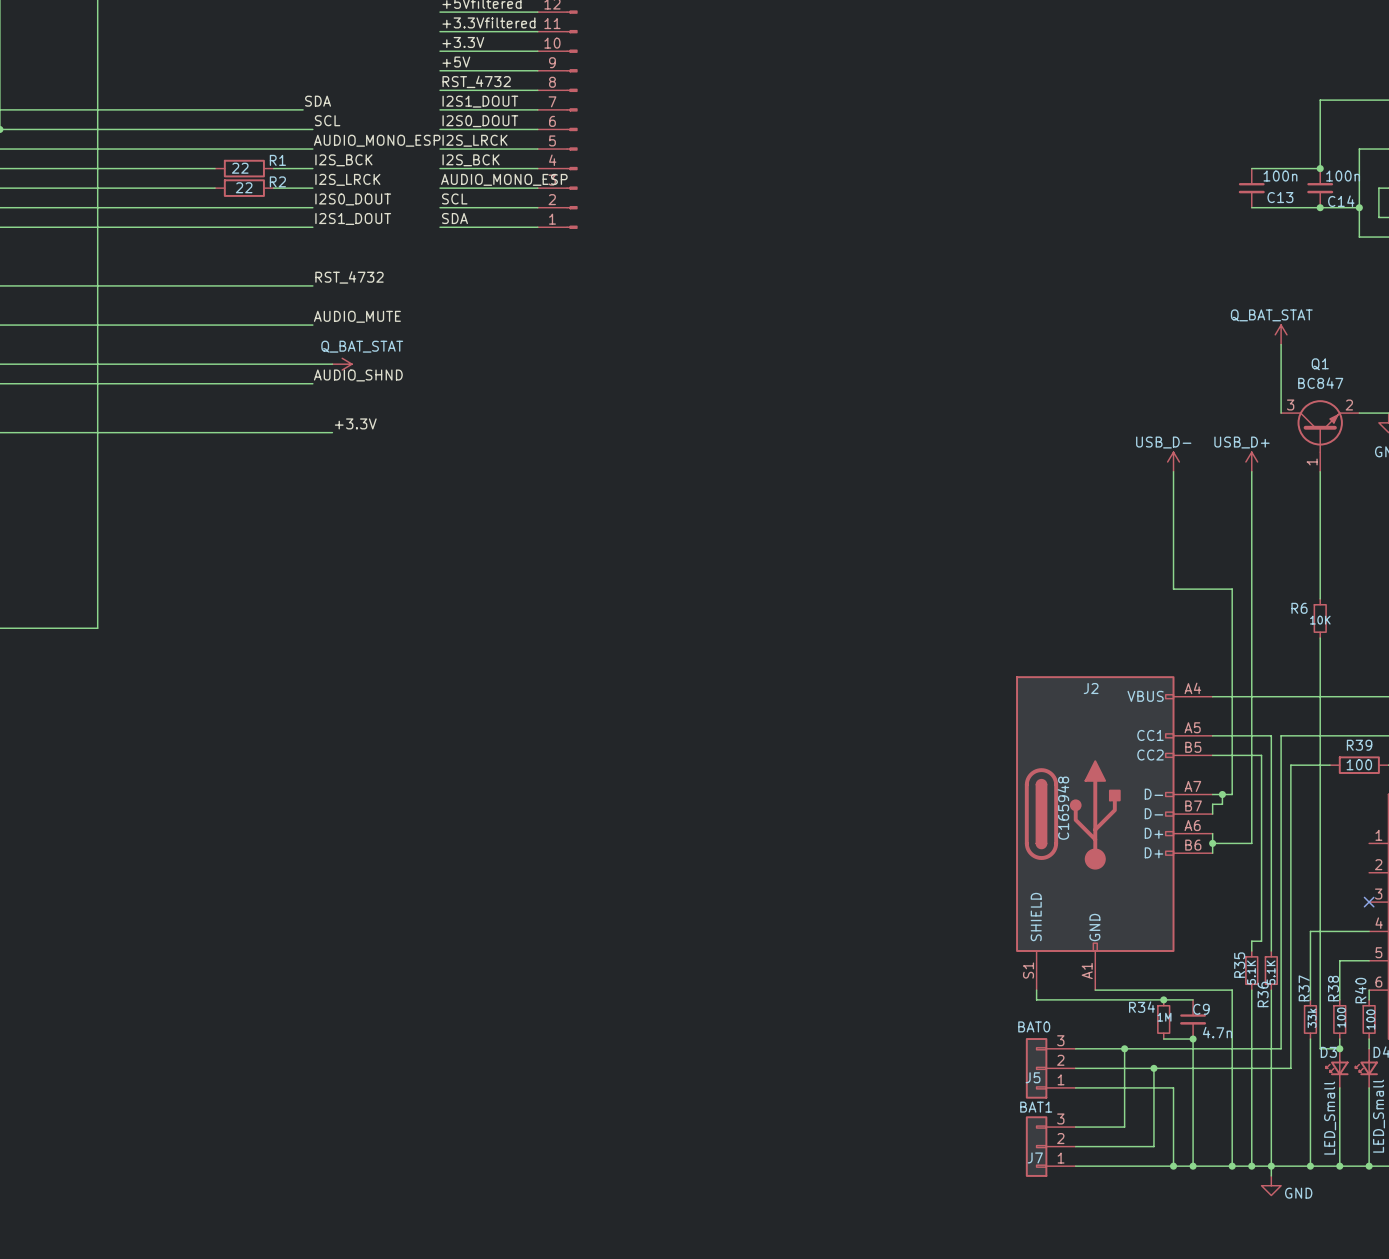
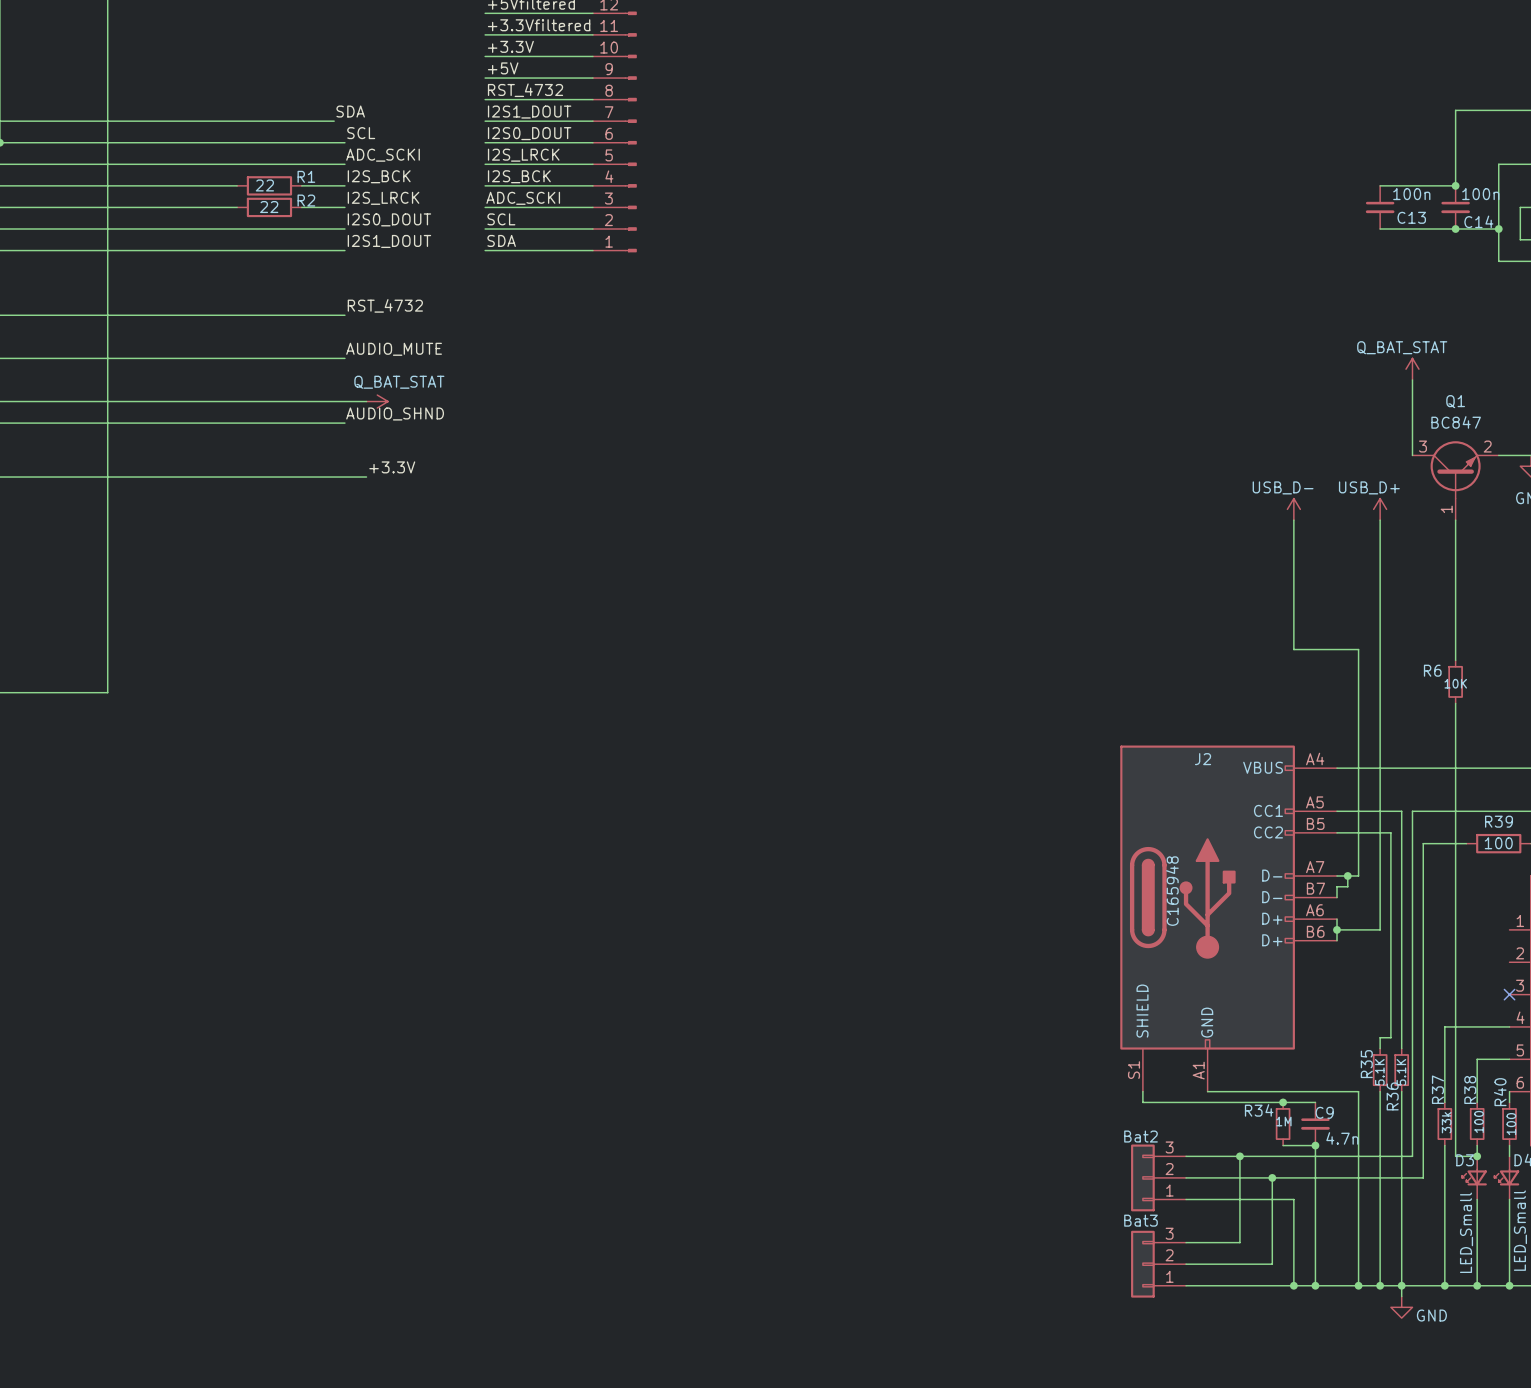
label: AUDIO_MONO_ESP (377, 140) -> ADC_SCKI (383, 155)
label: AUDIO_MONO_ESP (504, 179) -> ADC_SCKI (523, 198)
J5 value: BAT0 (1034, 1026) -> none
J5 name: J5 (1033, 1077) -> Bat2 (1141, 1136)
J7 value: BAT1 (1036, 1107) -> none
J7 name: J7 (1035, 1157) -> Bat3 (1141, 1220)

